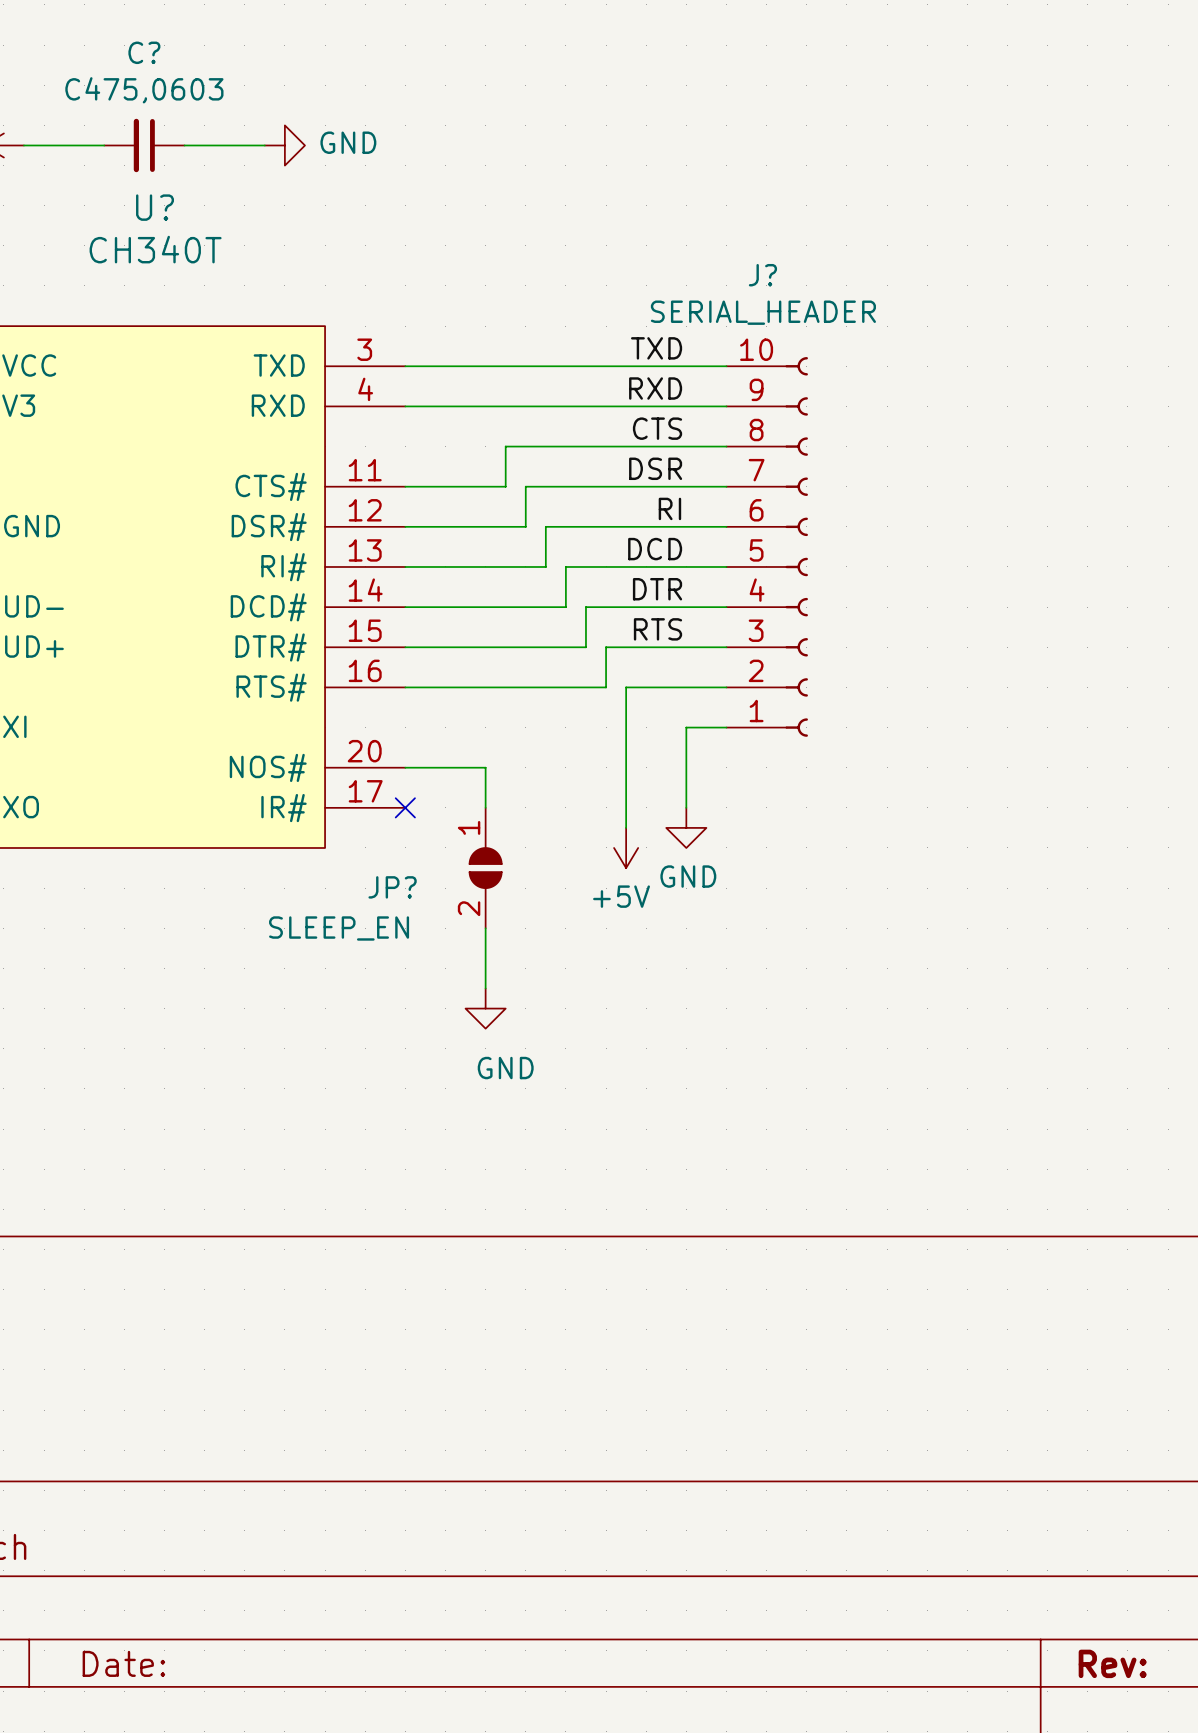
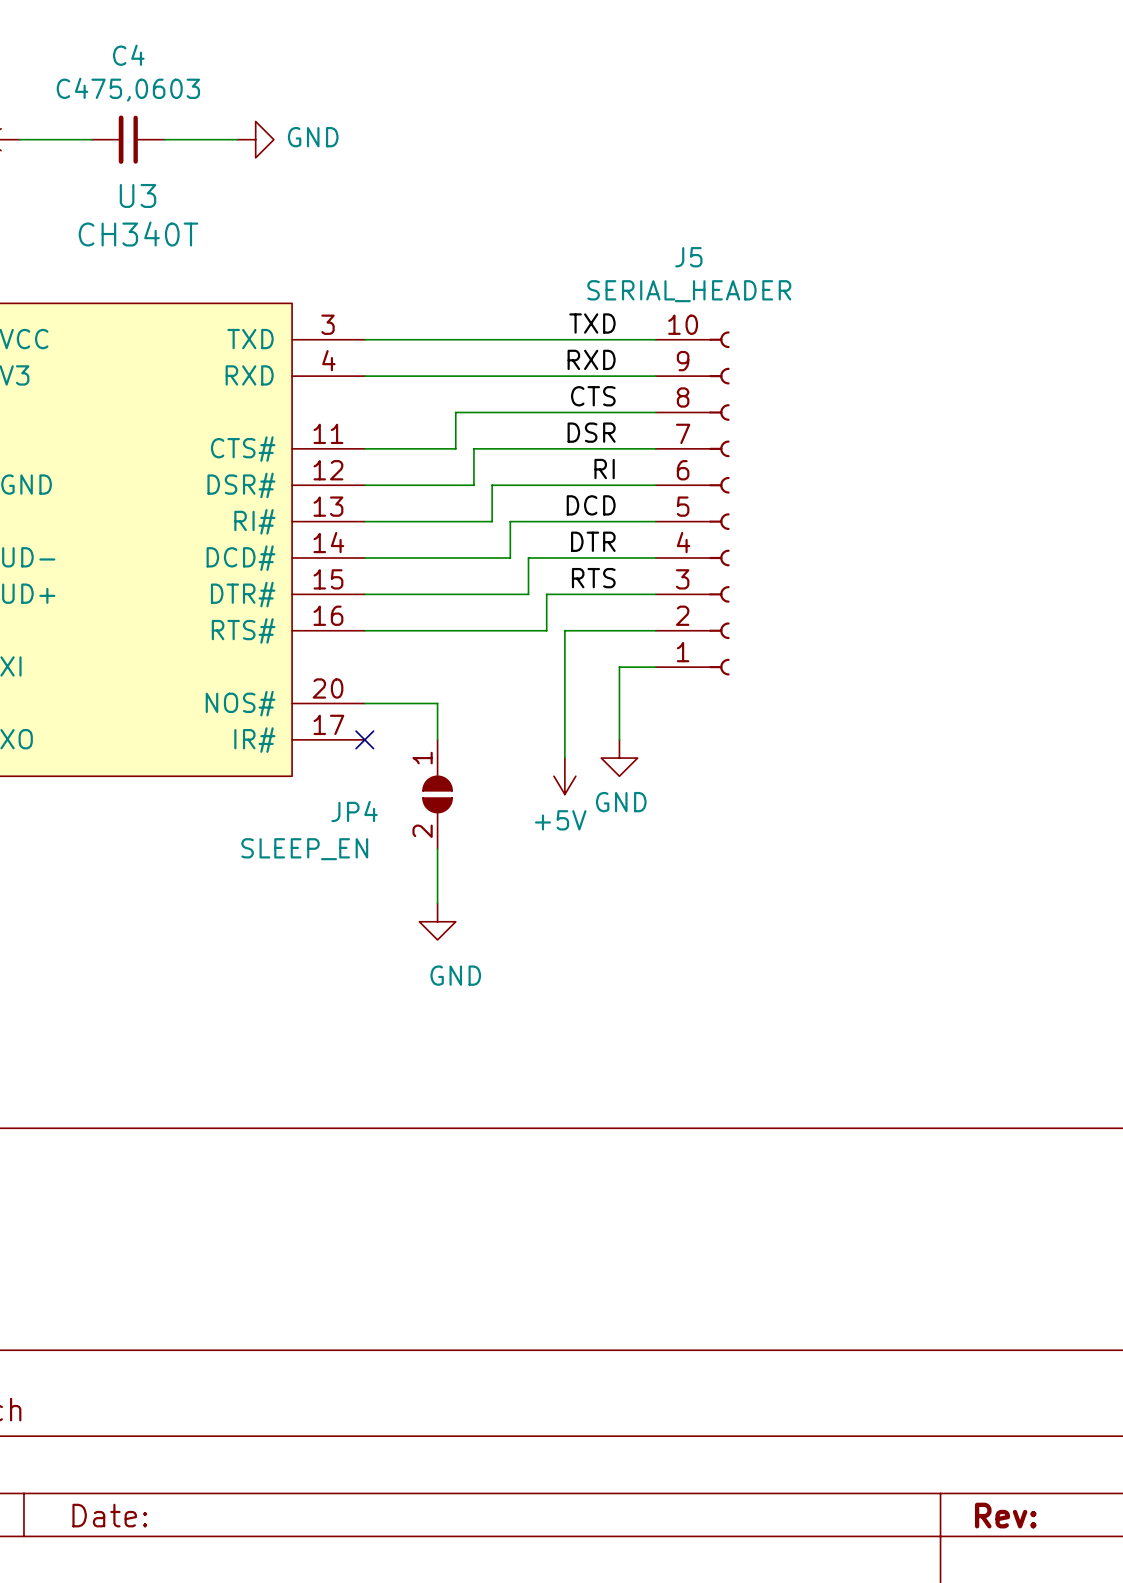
C? name: C? (144, 52) -> C4 (128, 55)
U? name: U? (155, 207) -> U3 (137, 195)
J? name: J? (762, 275) -> J5 (688, 257)
JP? name: JP? (392, 887) -> JP4 (354, 811)

